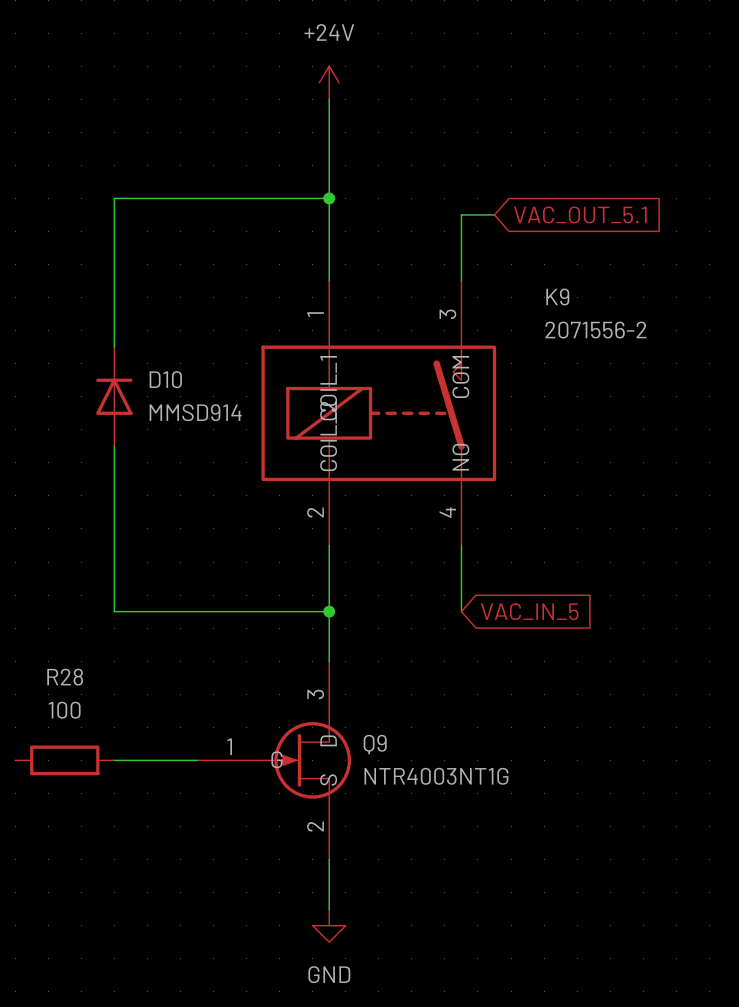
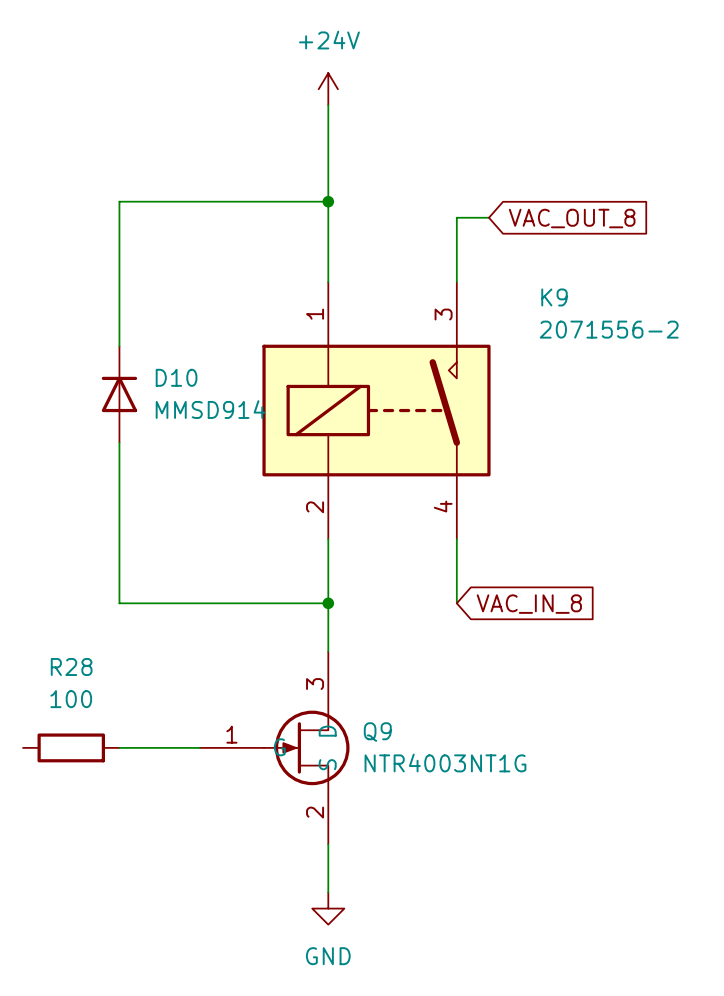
global label: VAC_OUT_5.1 (580, 214) -> VAC_OUT_8 (572, 218)
K9 pin name: COM (460, 376) -> none
K9 pin name: COIL_1 (328, 388) -> none
K9 pin name: COIL_2 (328, 436) -> none
K9 pin name: NO (460, 457) -> none
global label: VAC_IN_5 (529, 611) -> VAC_IN_8 (529, 604)

